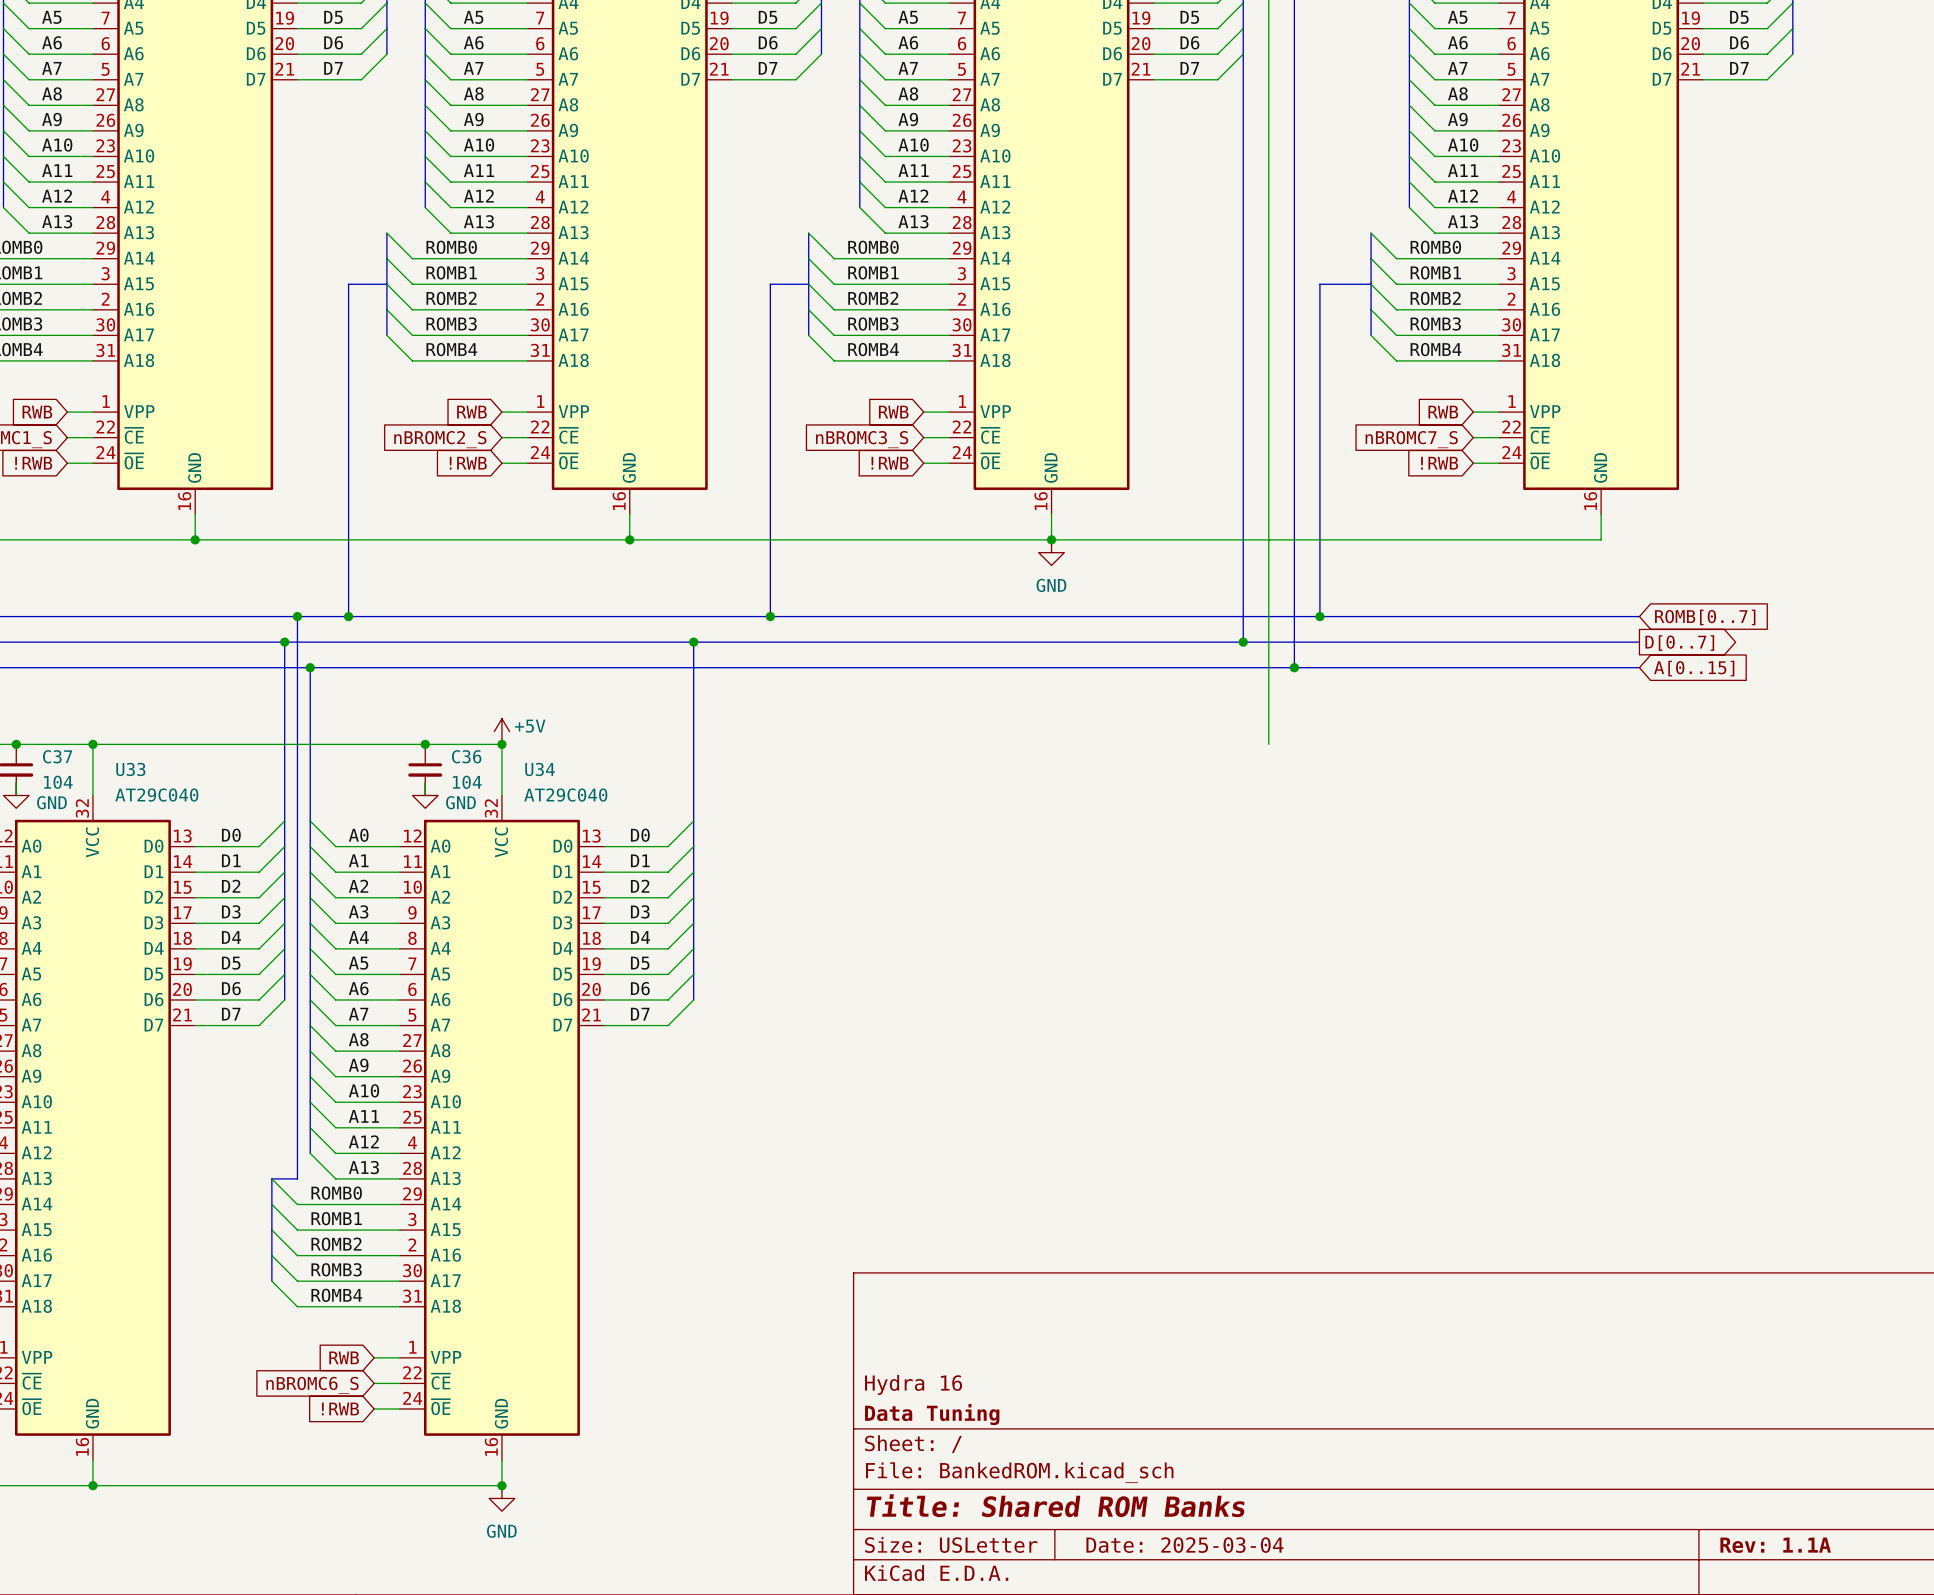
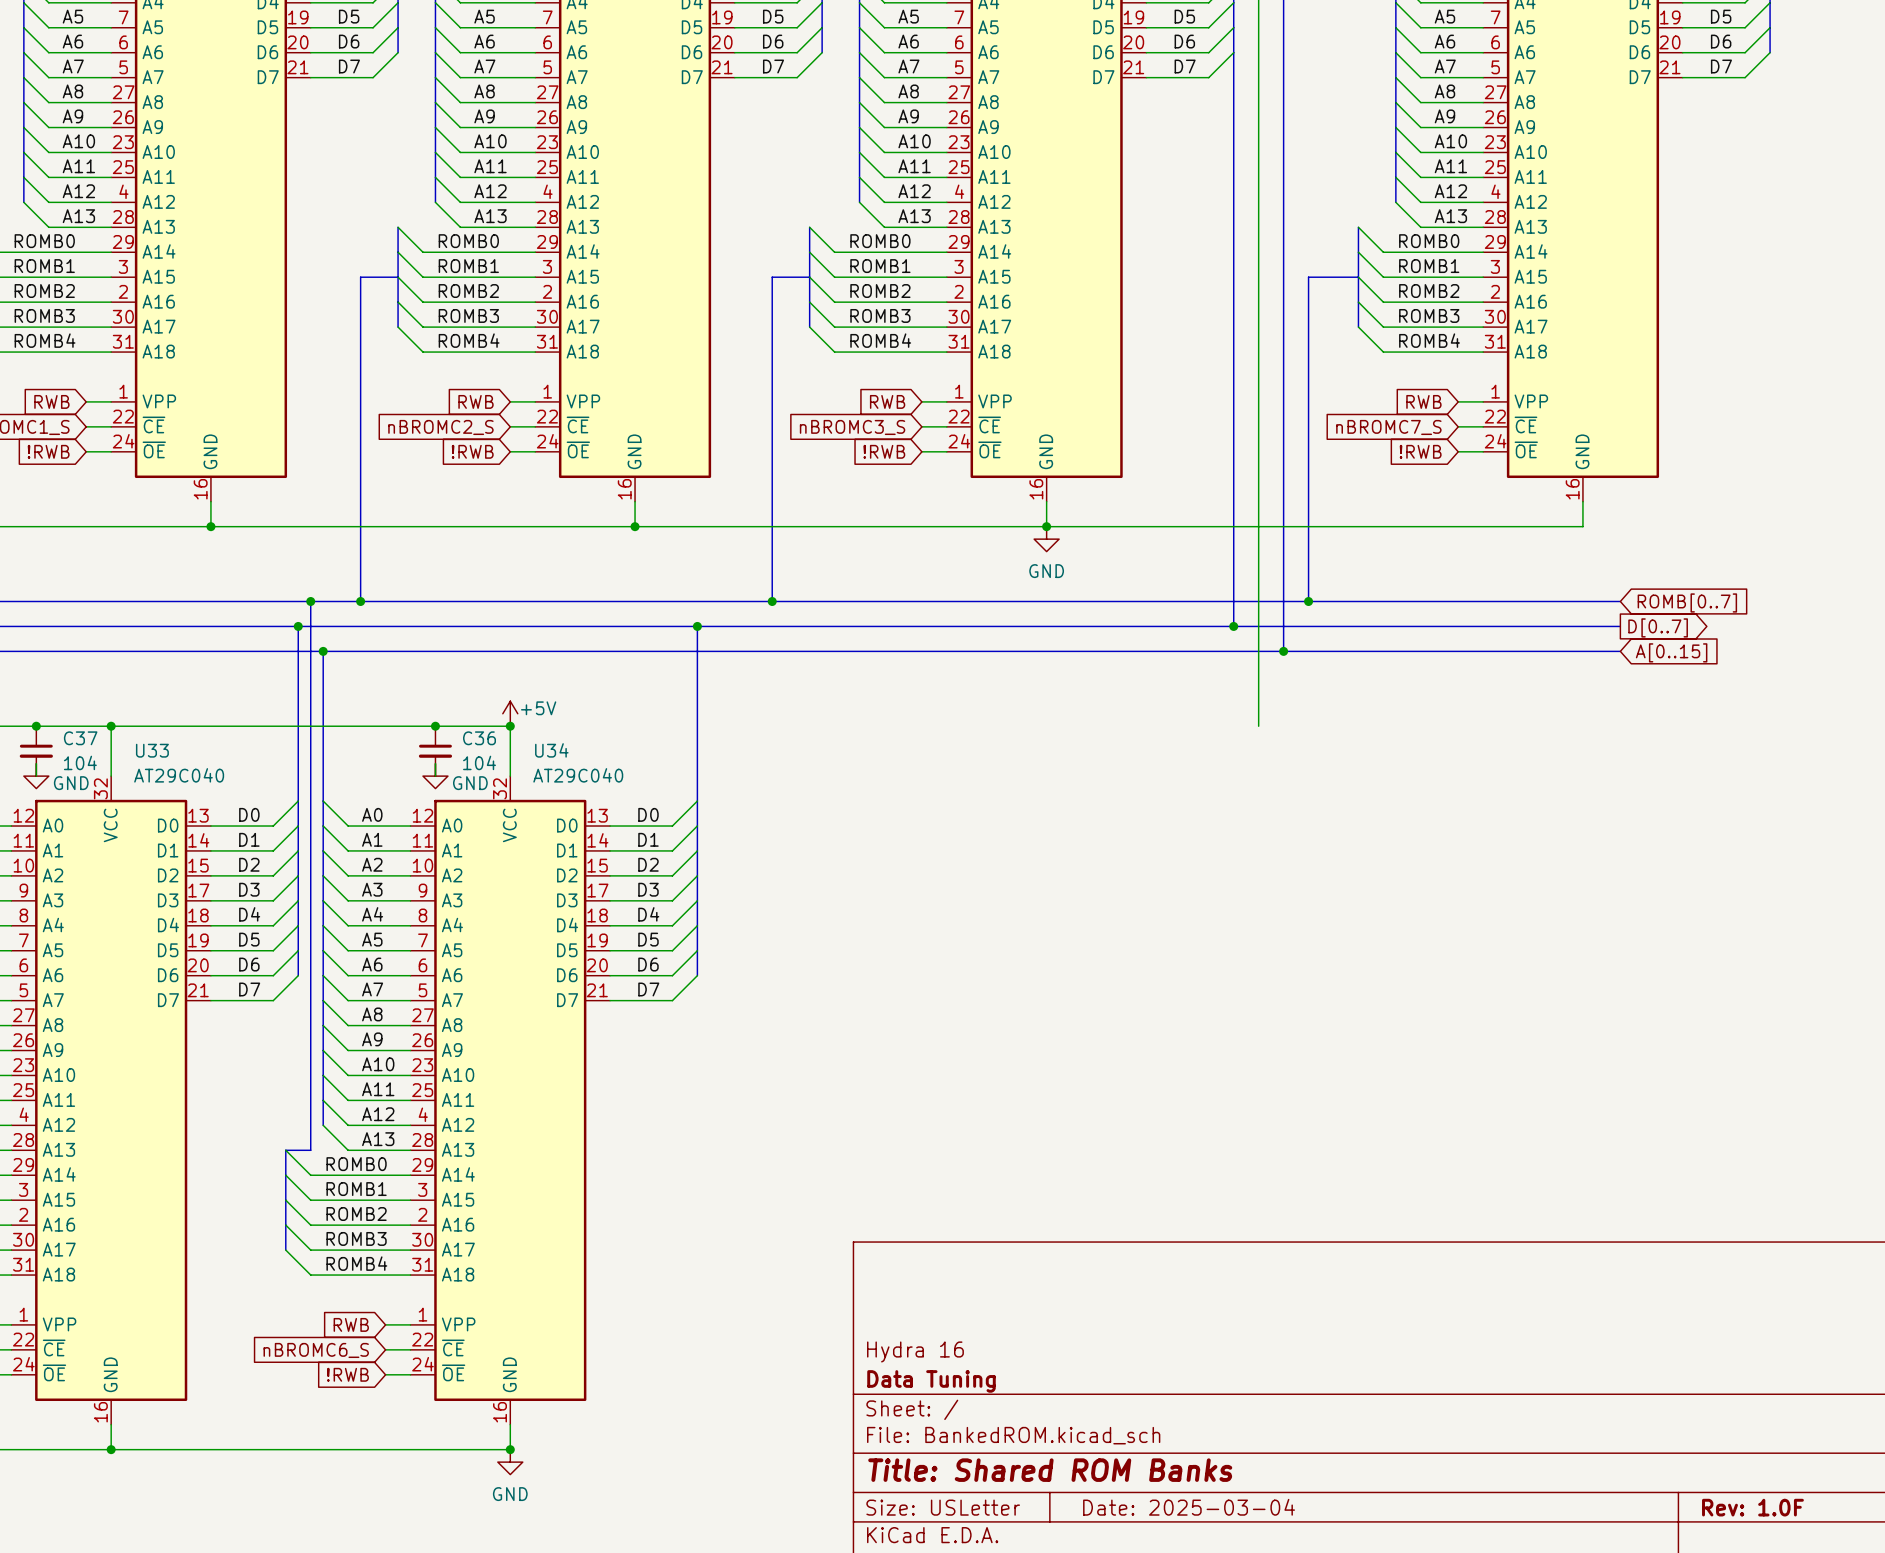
title block: Rev: 1.1A (1775, 1545) -> Rev: 1.0F (1752, 1507)

